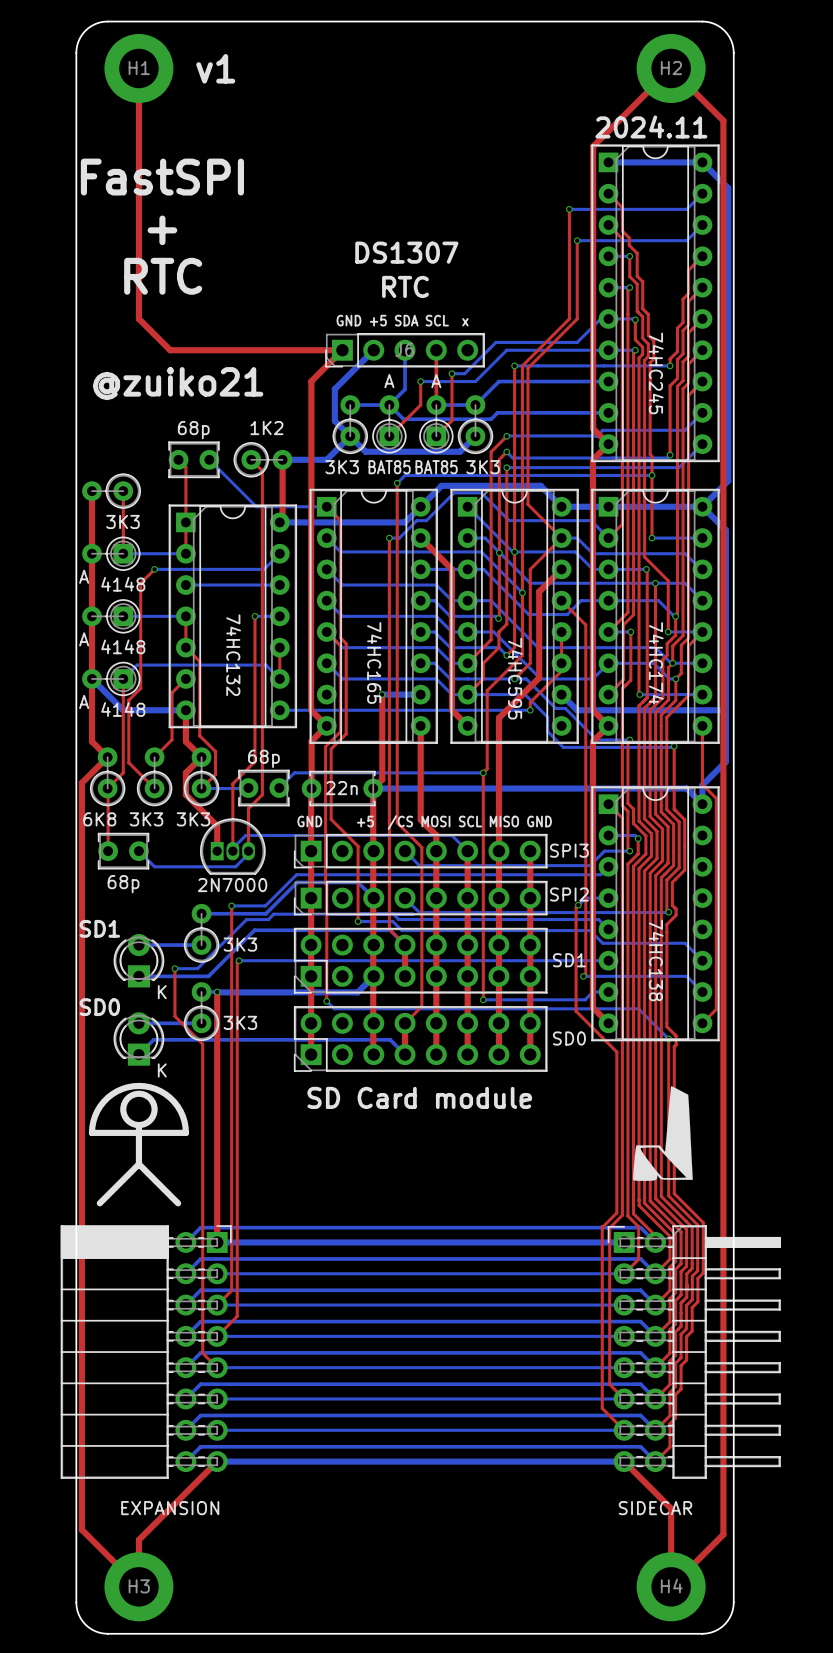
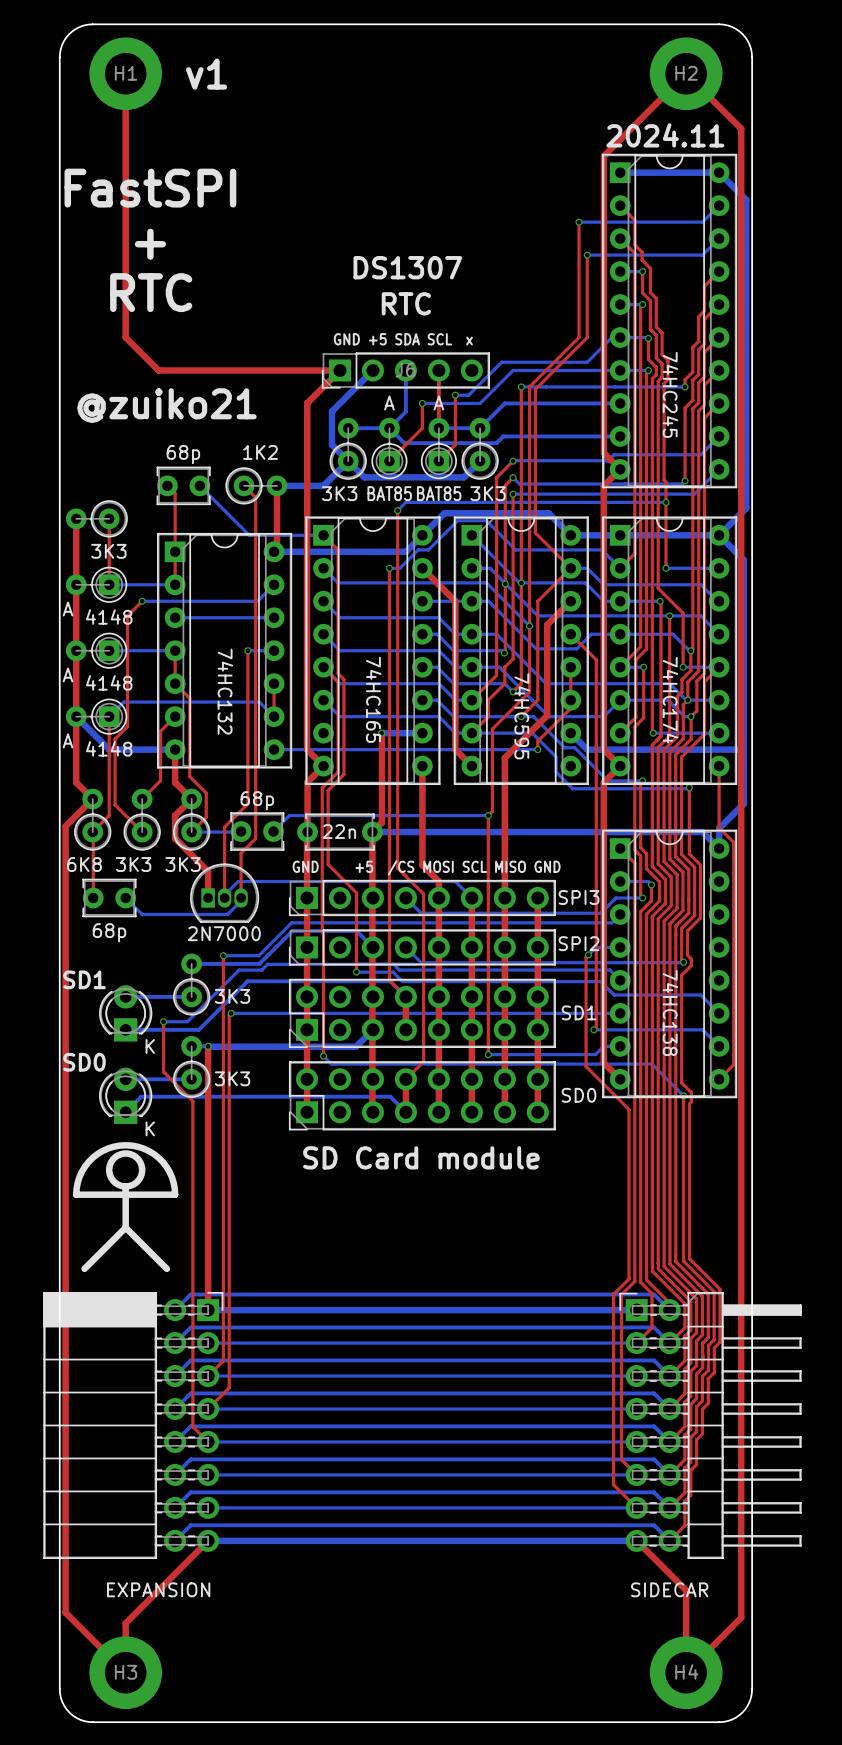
drawing: [633, 1086, 693, 1181] -> none

